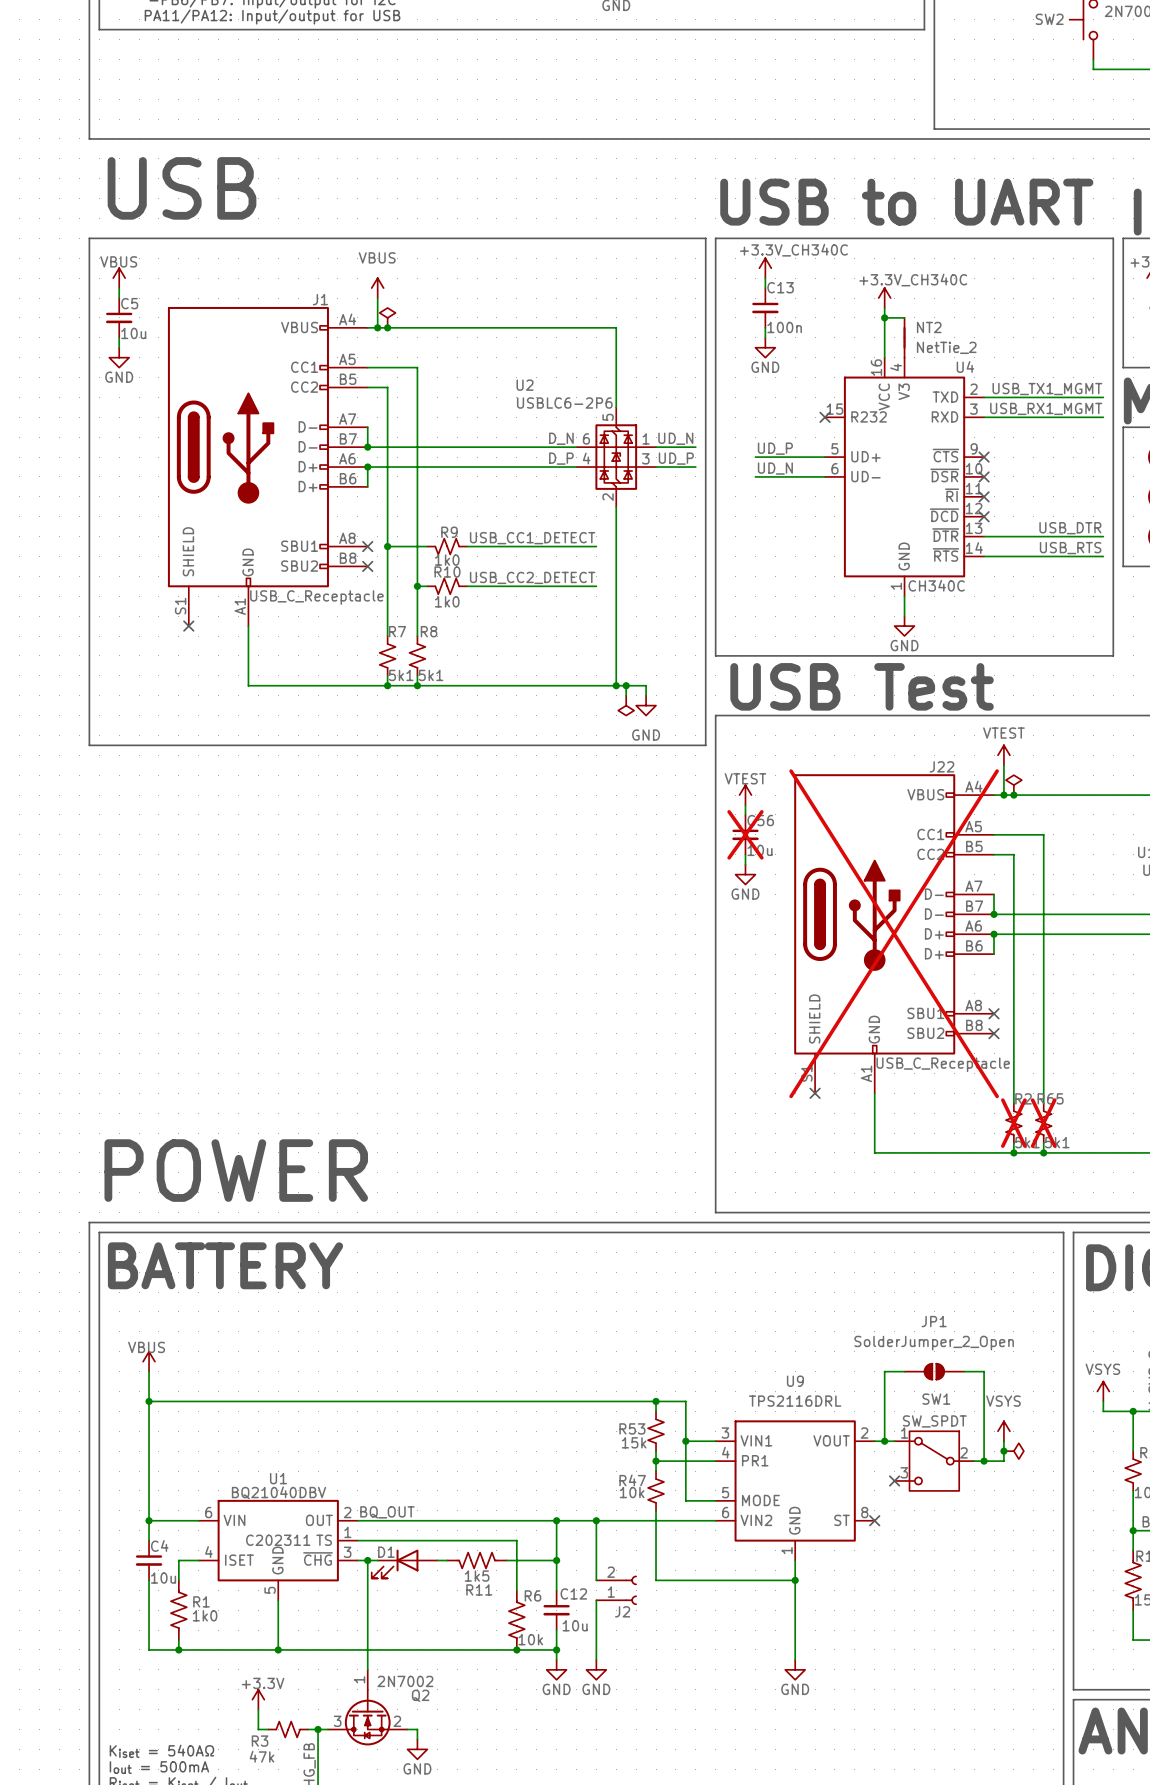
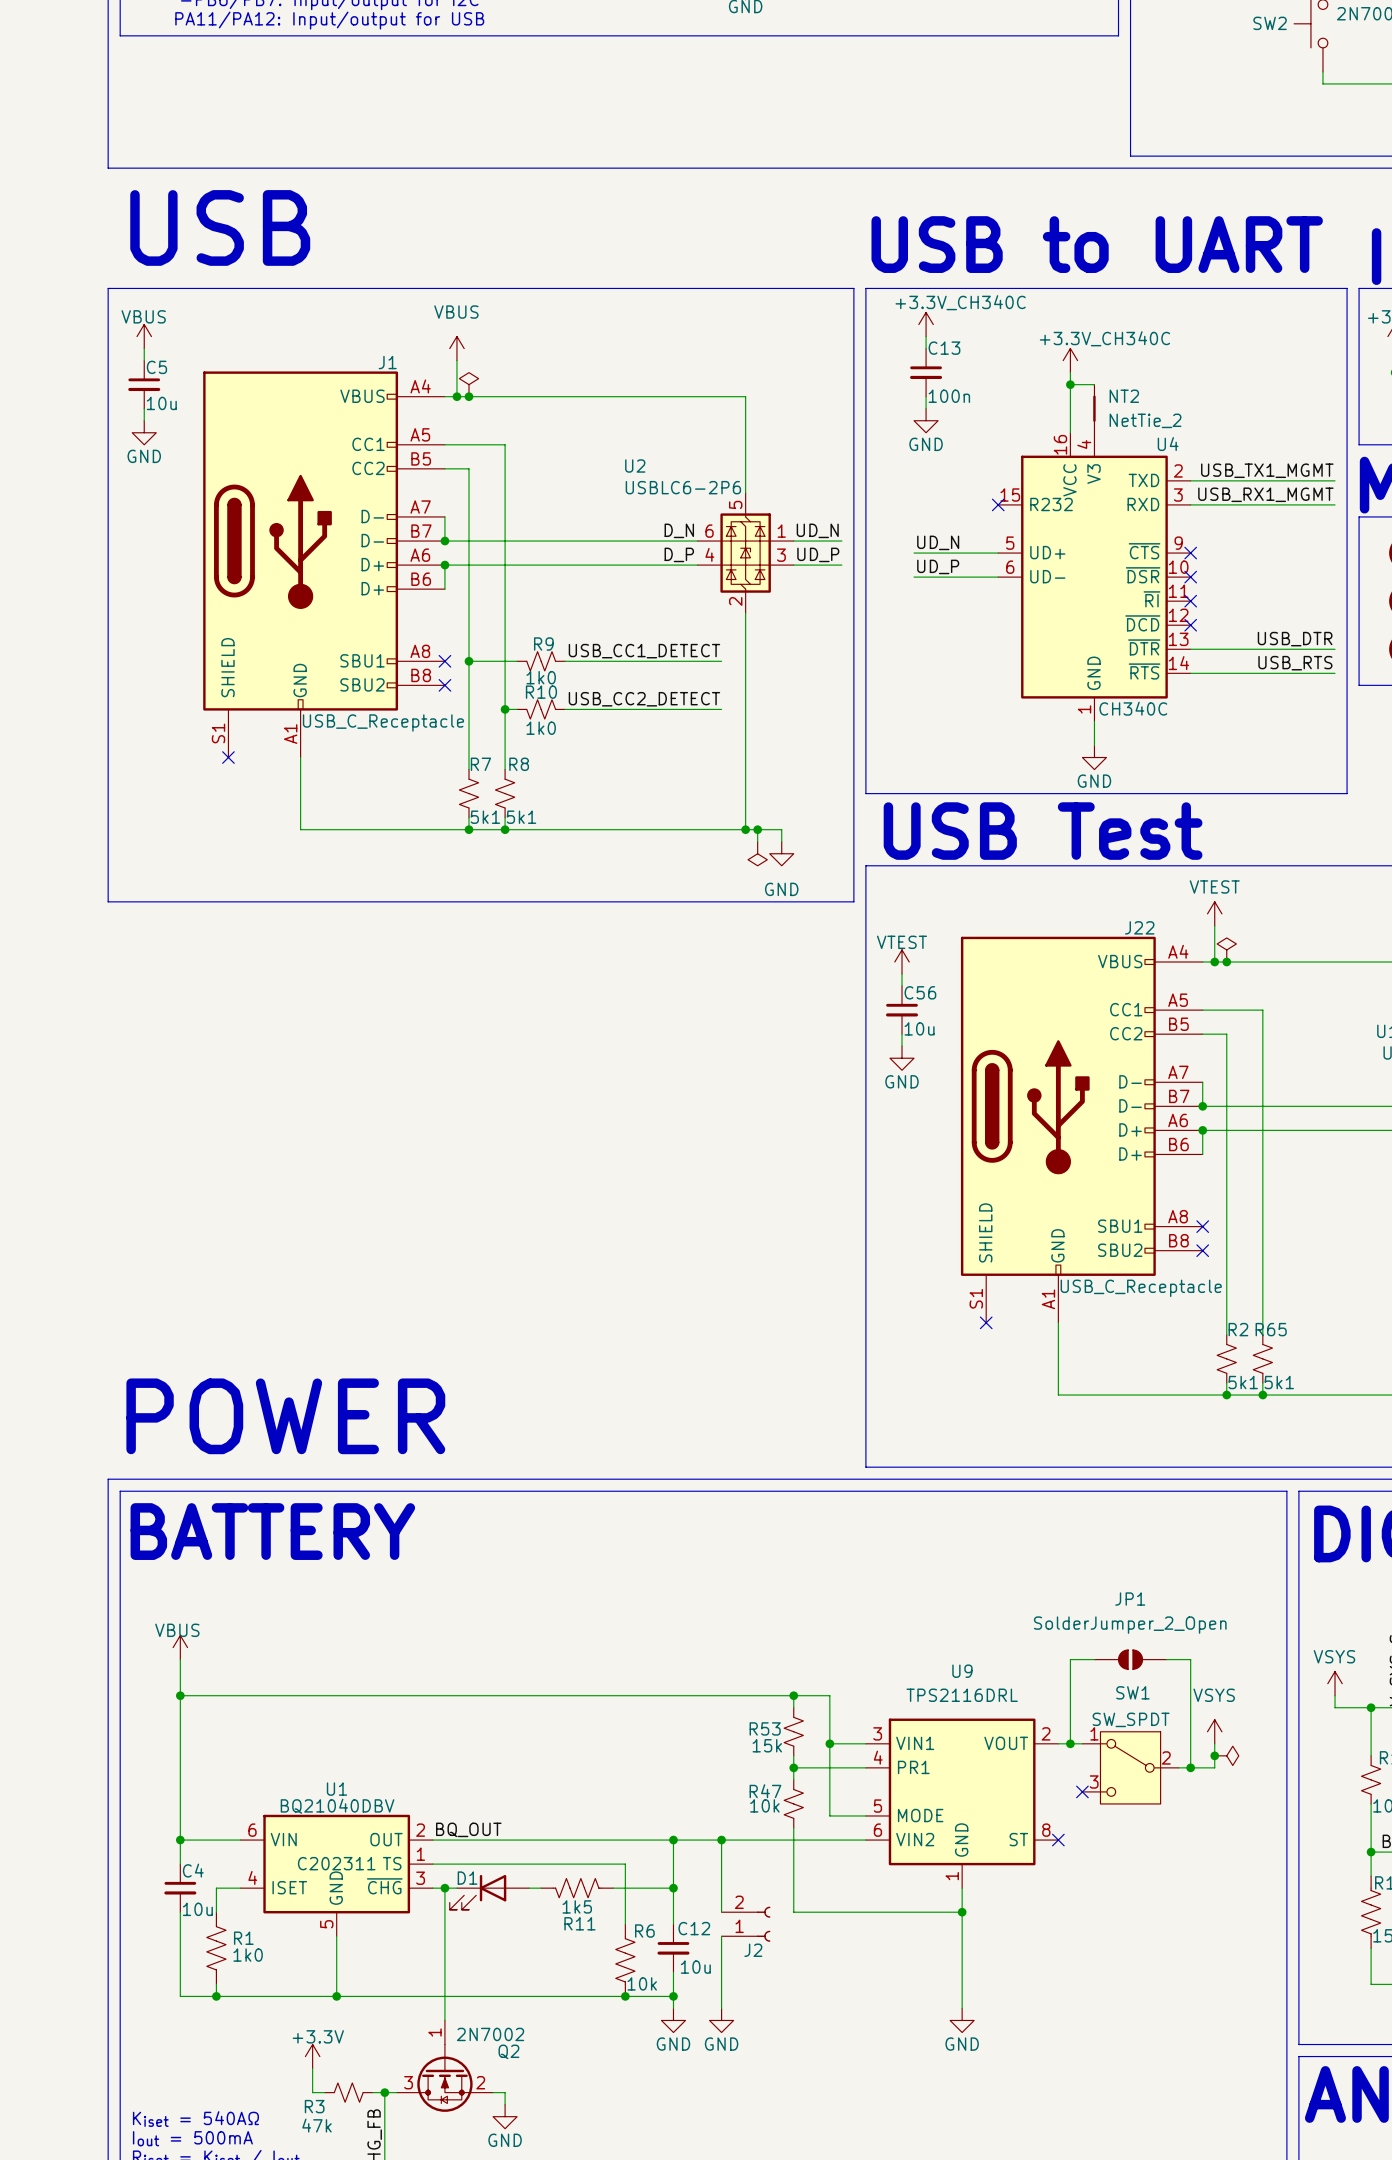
label: UD_P (775, 448) -> UD_N (938, 542)
label: UD_N (775, 468) -> UD_P (938, 566)
C56 do-not-place cross: (745, 834) -> none
J22 do-not-place cross: (894, 933) -> none
R2 do-not-place cross: (1013, 1123) -> none
R65 do-not-place cross: (1043, 1123) -> none

